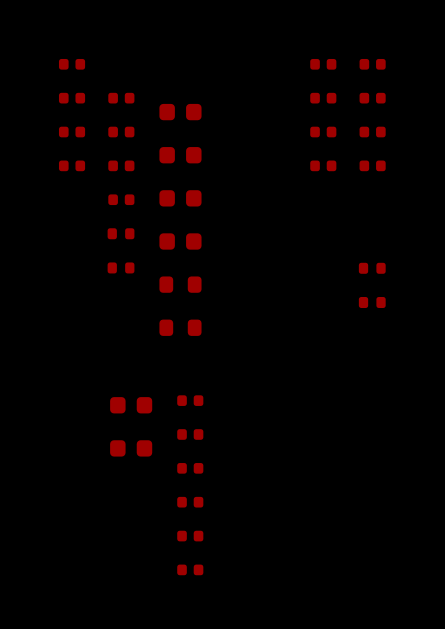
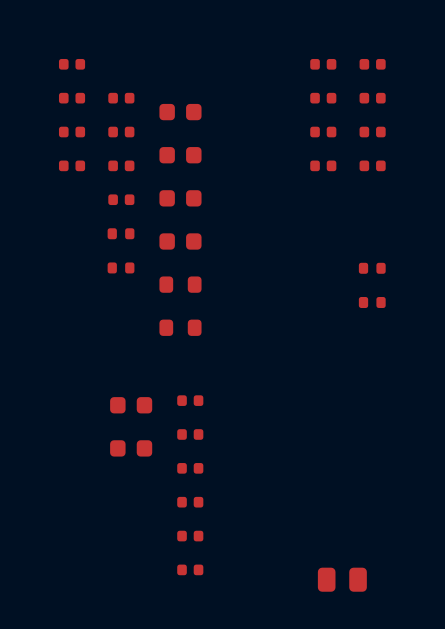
part: none -> (342, 579)

